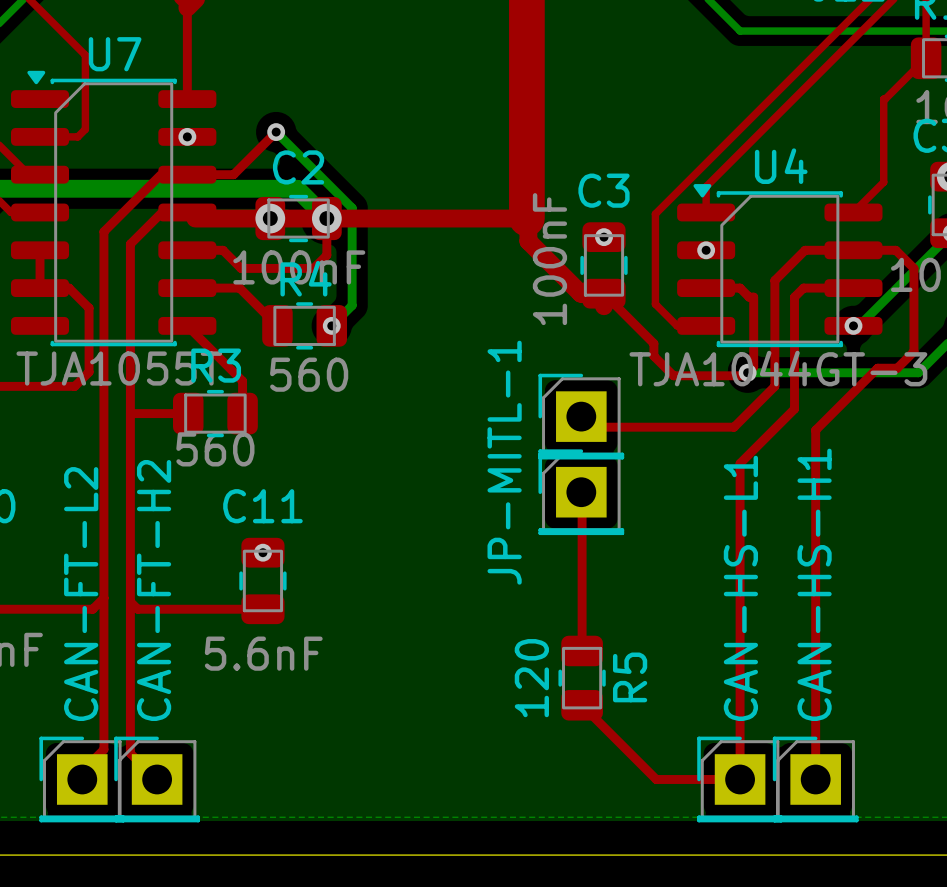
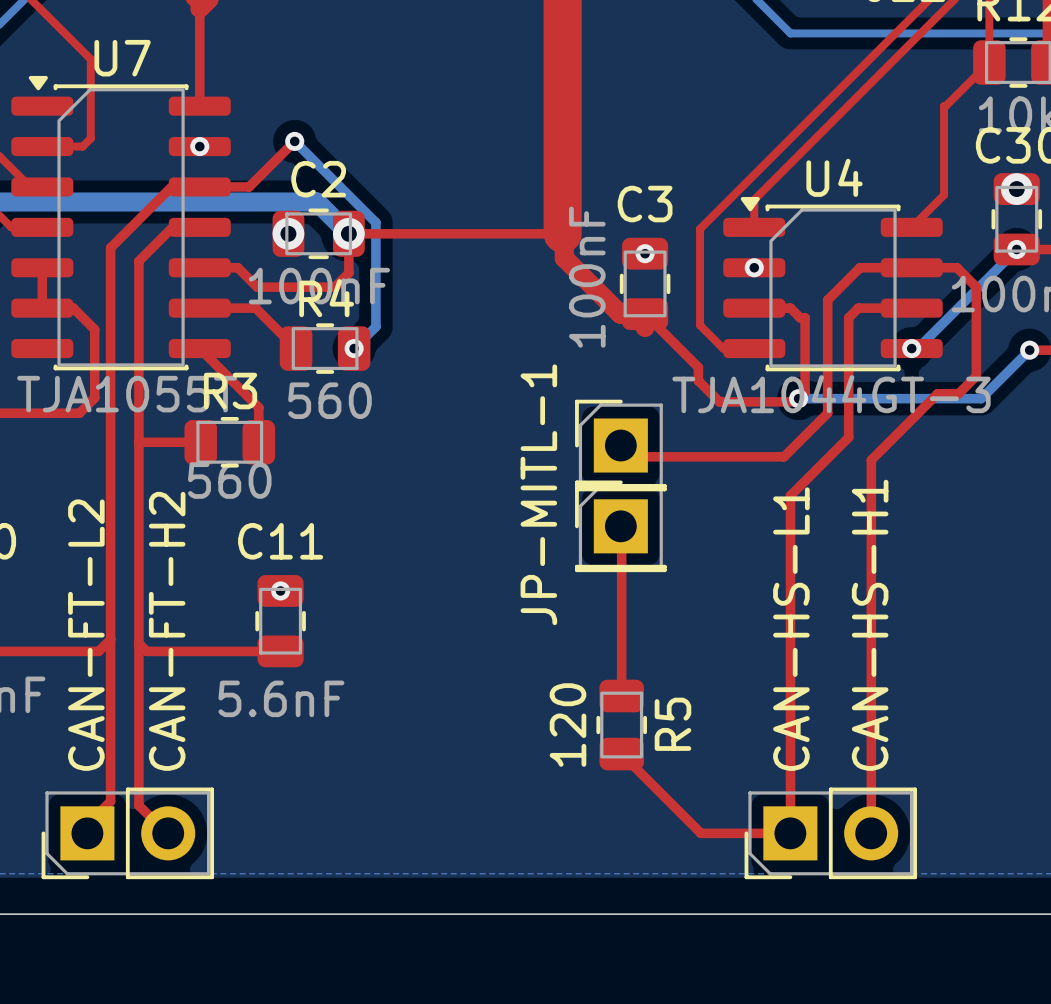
top track: (195, 218) (326, 218) -> none
top track width: thick (326, 218) (526, 218) -> thin (348, 233) (562, 233)
text: none -> CAN-FT-H2 (167, 631)
CAN-FT-L2: (82, 779) -> none
part: none -> (127, 833)
CAN-FT-H2: (157, 779) -> none
CAN-HS-L1: (740, 779) -> none
part: none -> (830, 833)
CAN-HS-H1: (815, 779) -> none

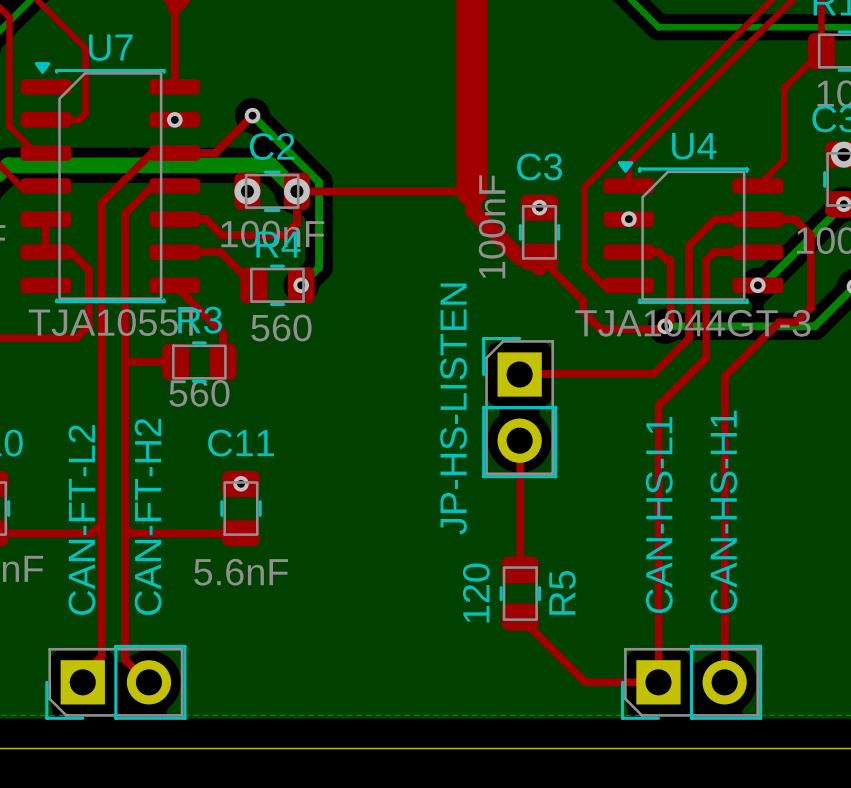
JP-MITL-1: (620, 445) -> none
JP-HS-LISTEN: none -> (519, 407)
part: (620, 526) -> none

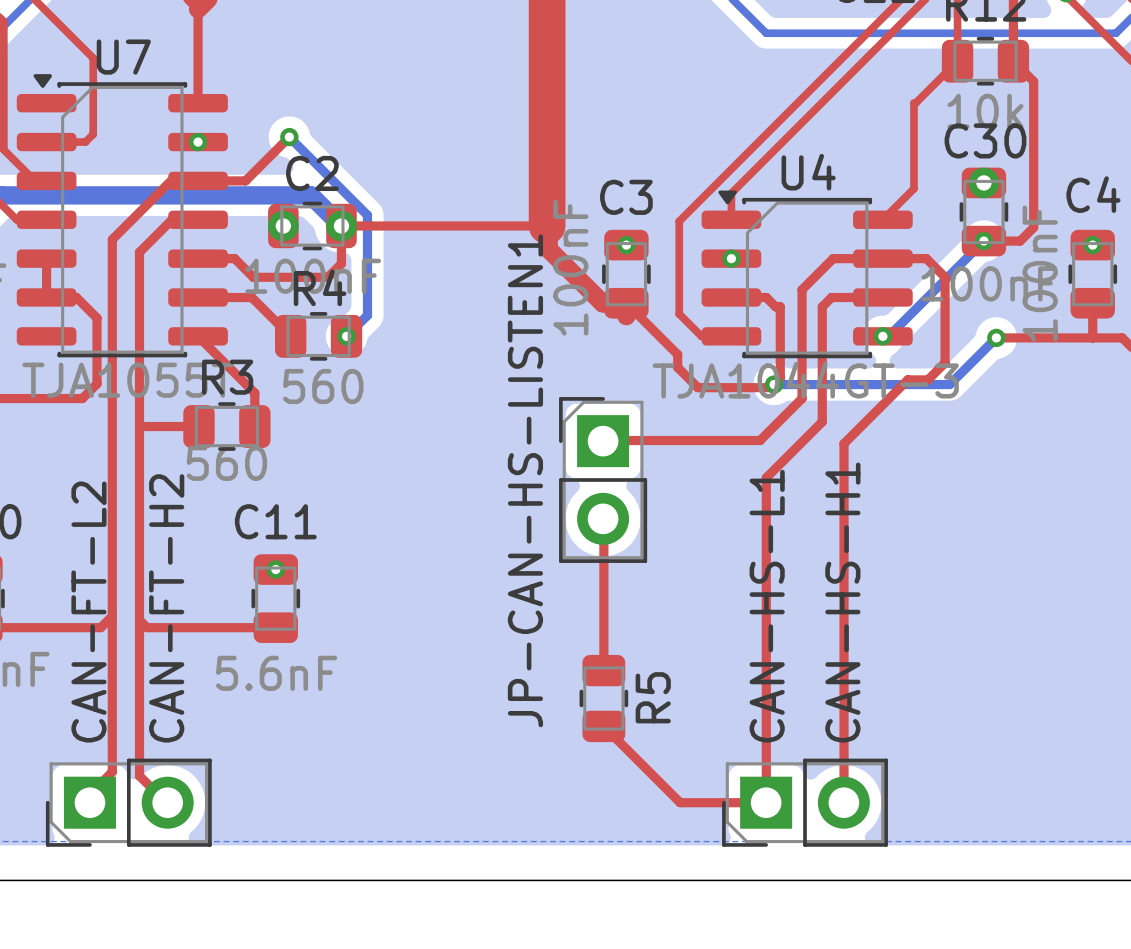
JP-HS-LISTEN name: JP-HS-LISTEN (453, 408) -> JP-CAN-HS-LISTEN1 (525, 480)
R5 value: 120 (476, 592) -> none

